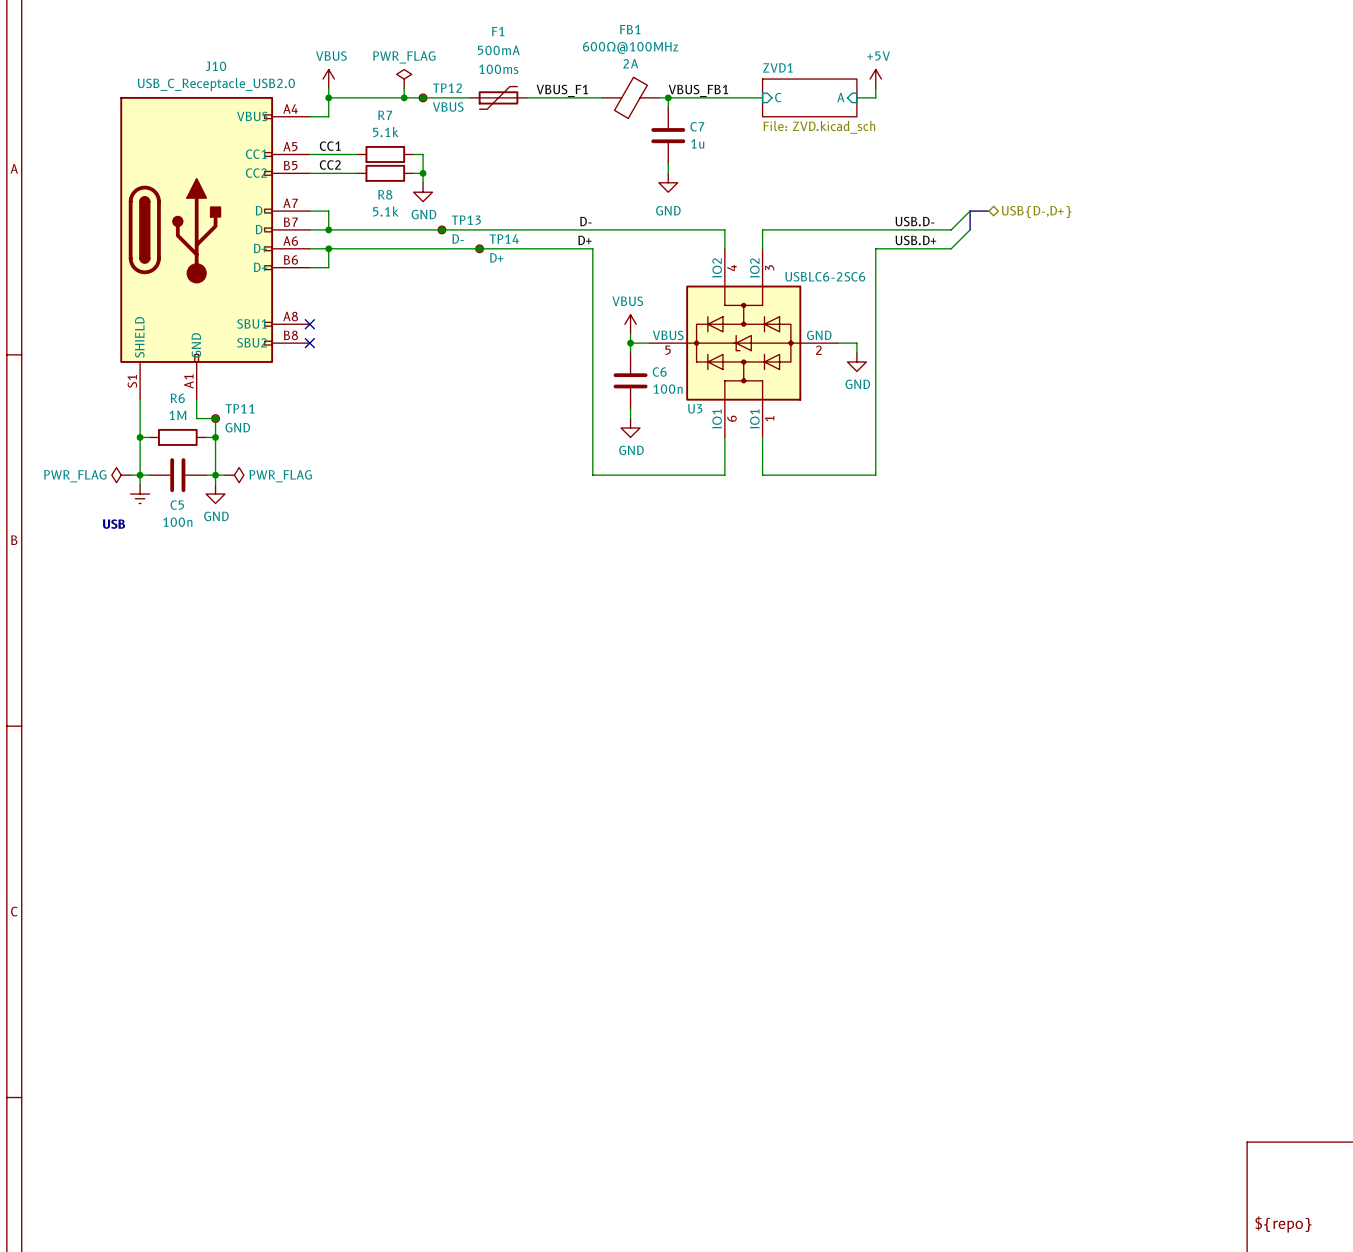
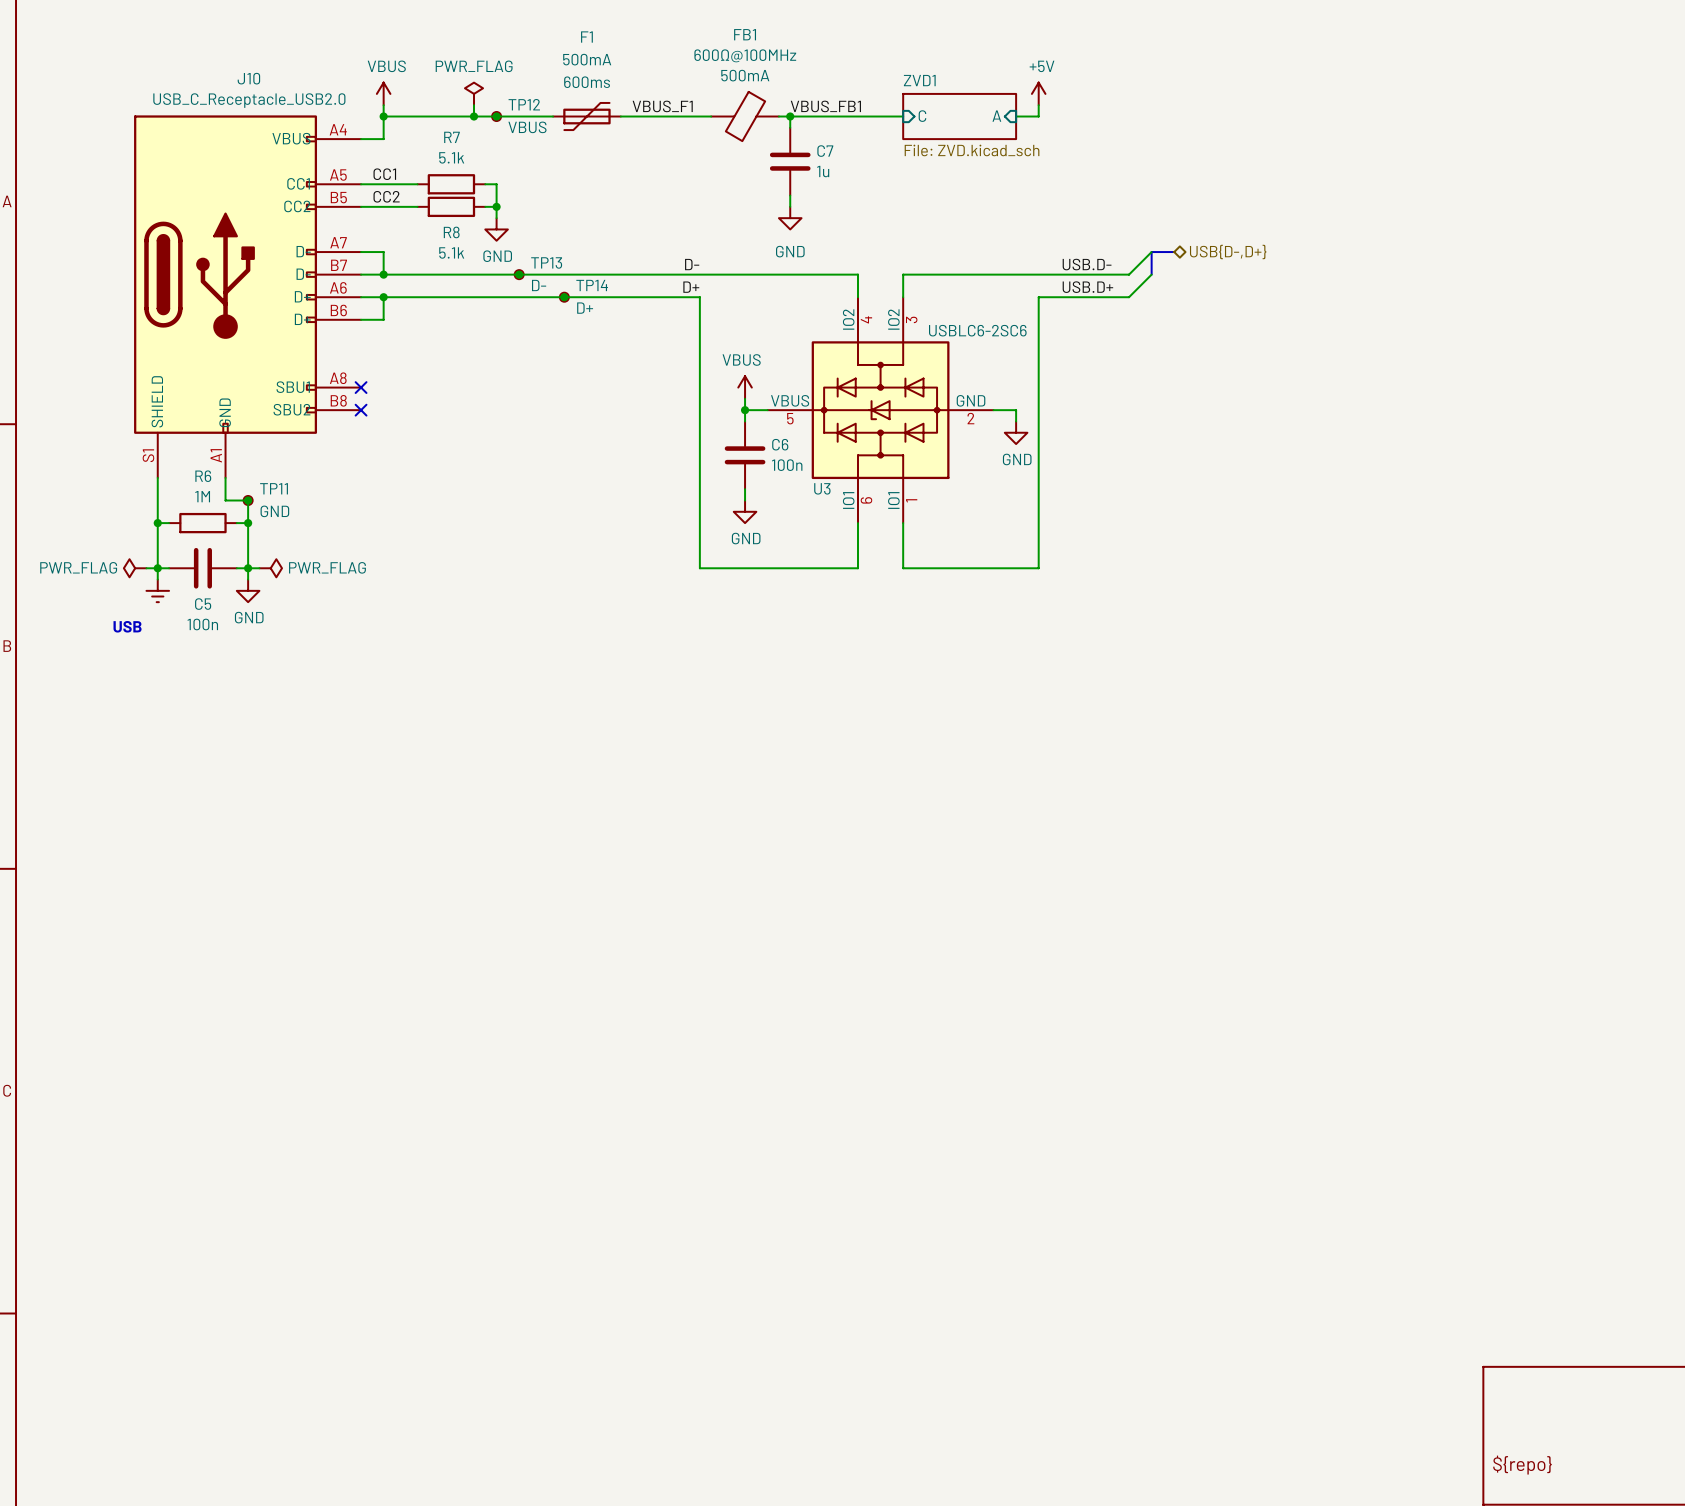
FB1 text: 2A (630, 63) -> 500mA (745, 75)
F1 text: 100ms (498, 69) -> 600ms (587, 82)

